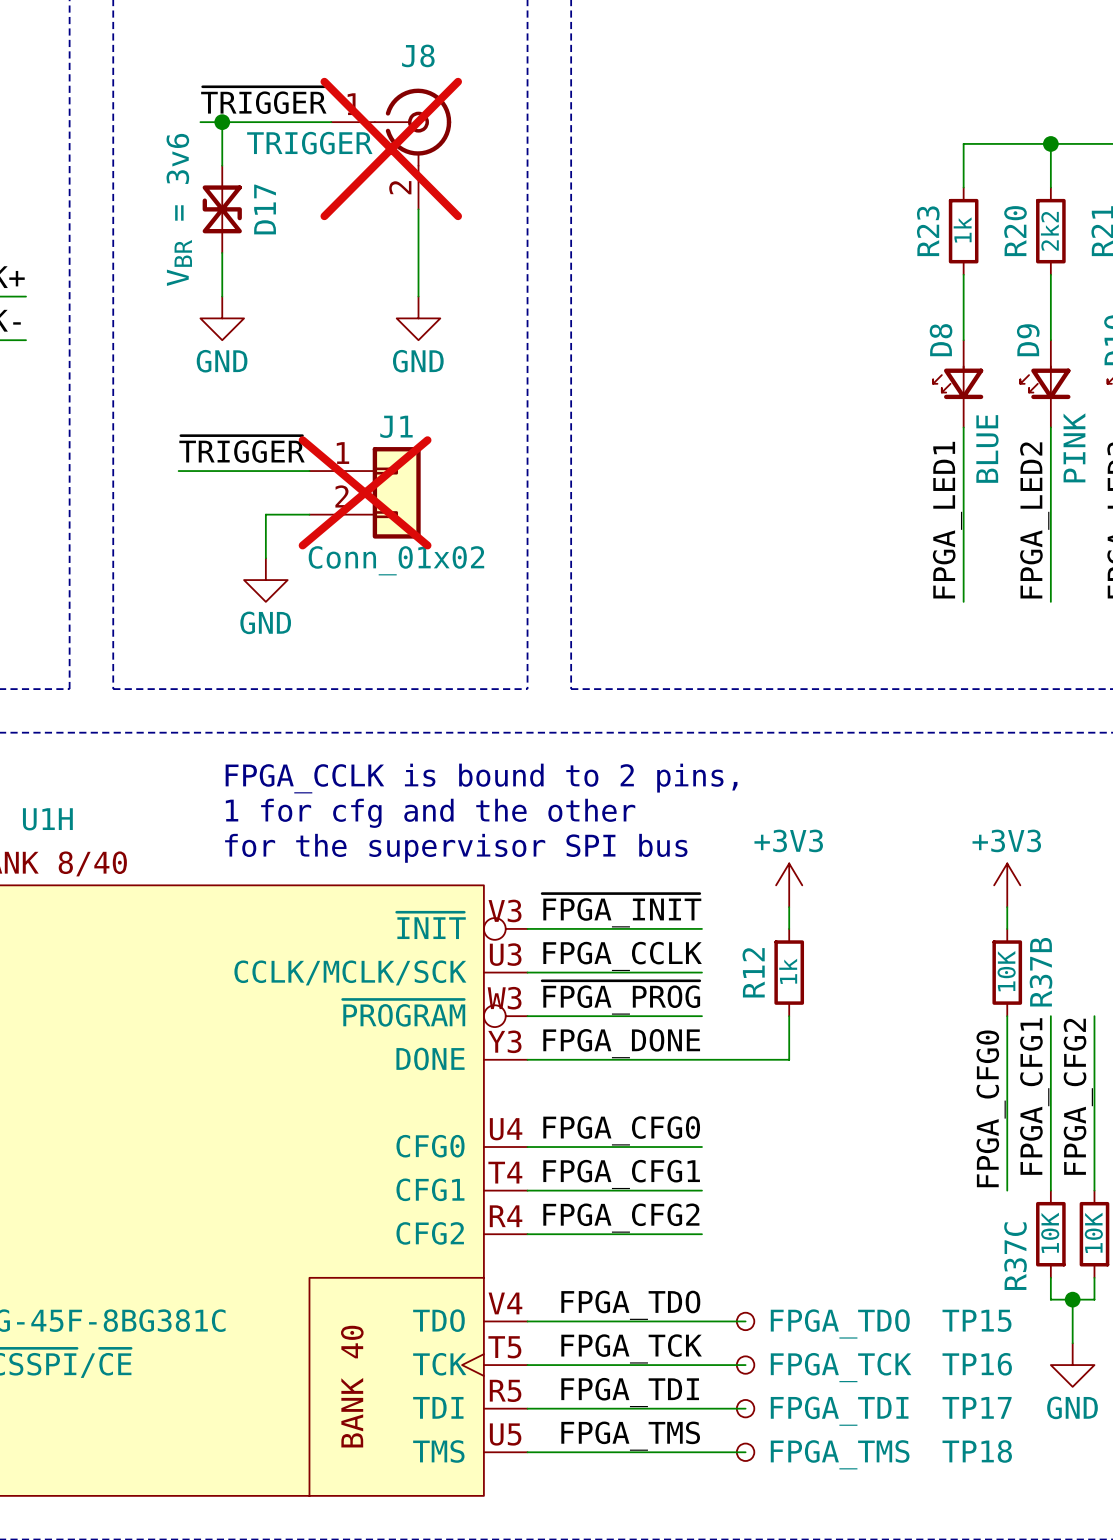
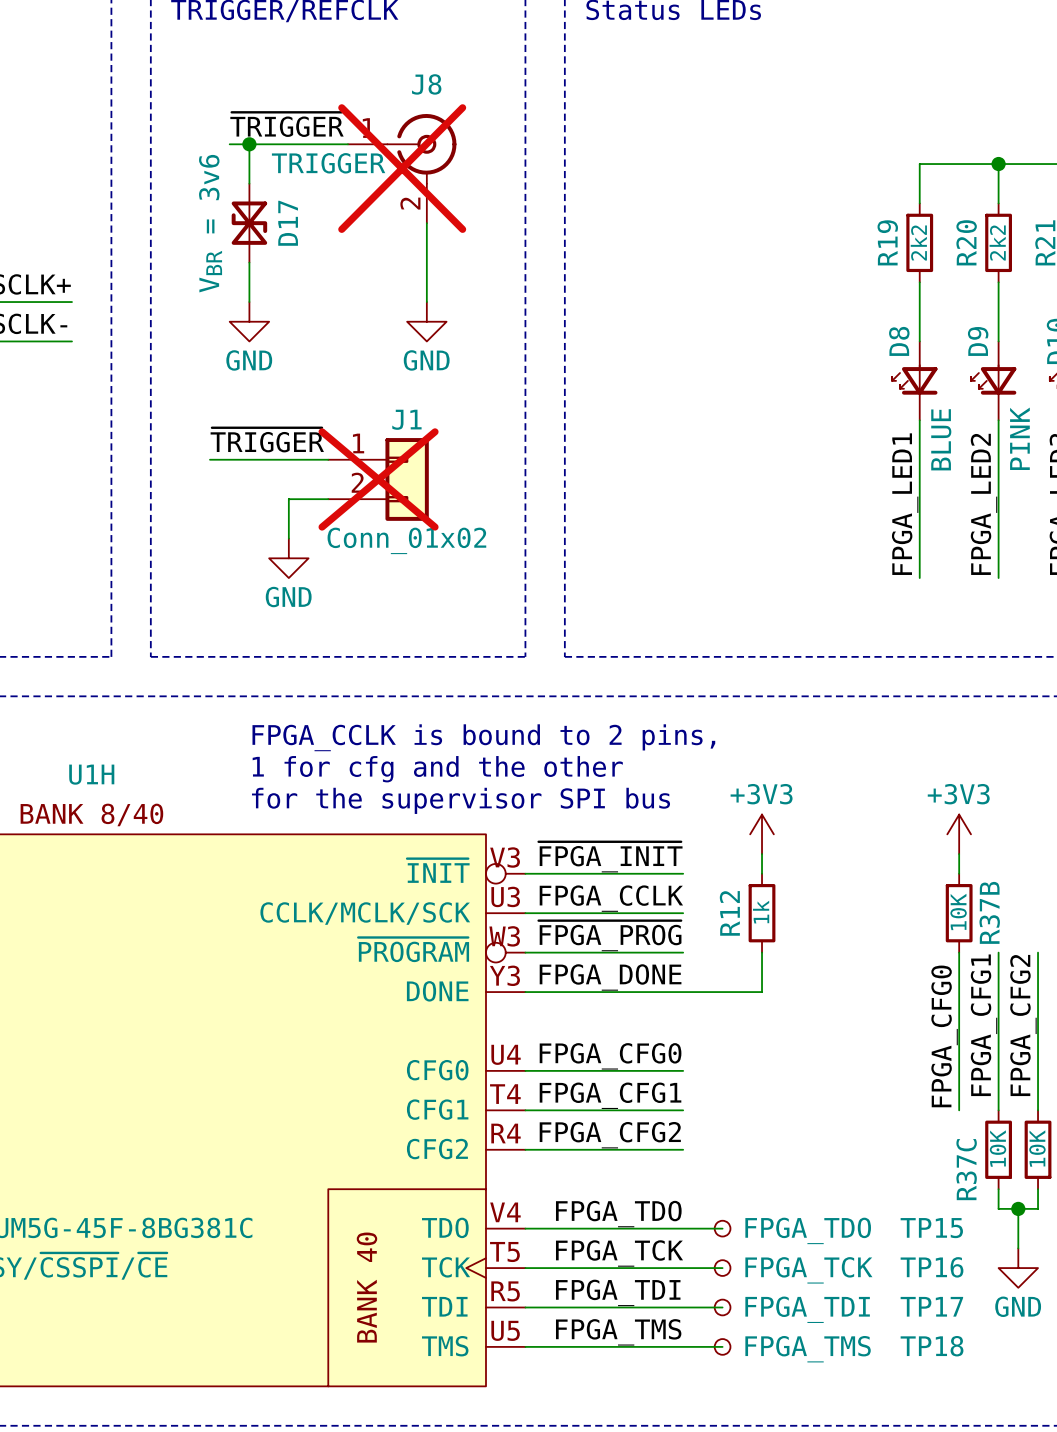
R23 value: 1k (962, 229) -> 2k2 (918, 242)
R23 name: R23 (928, 231) -> R19 (887, 242)

